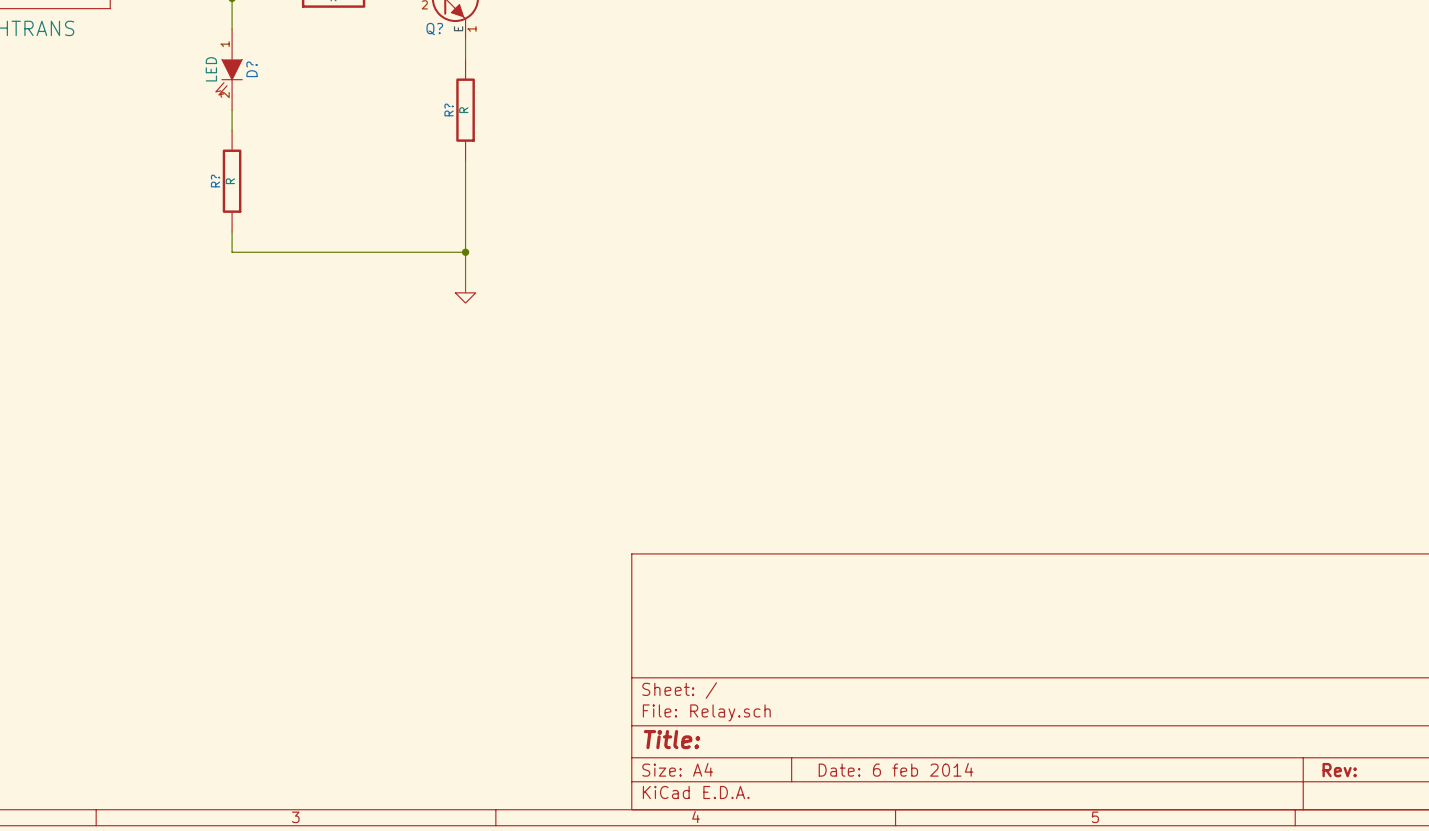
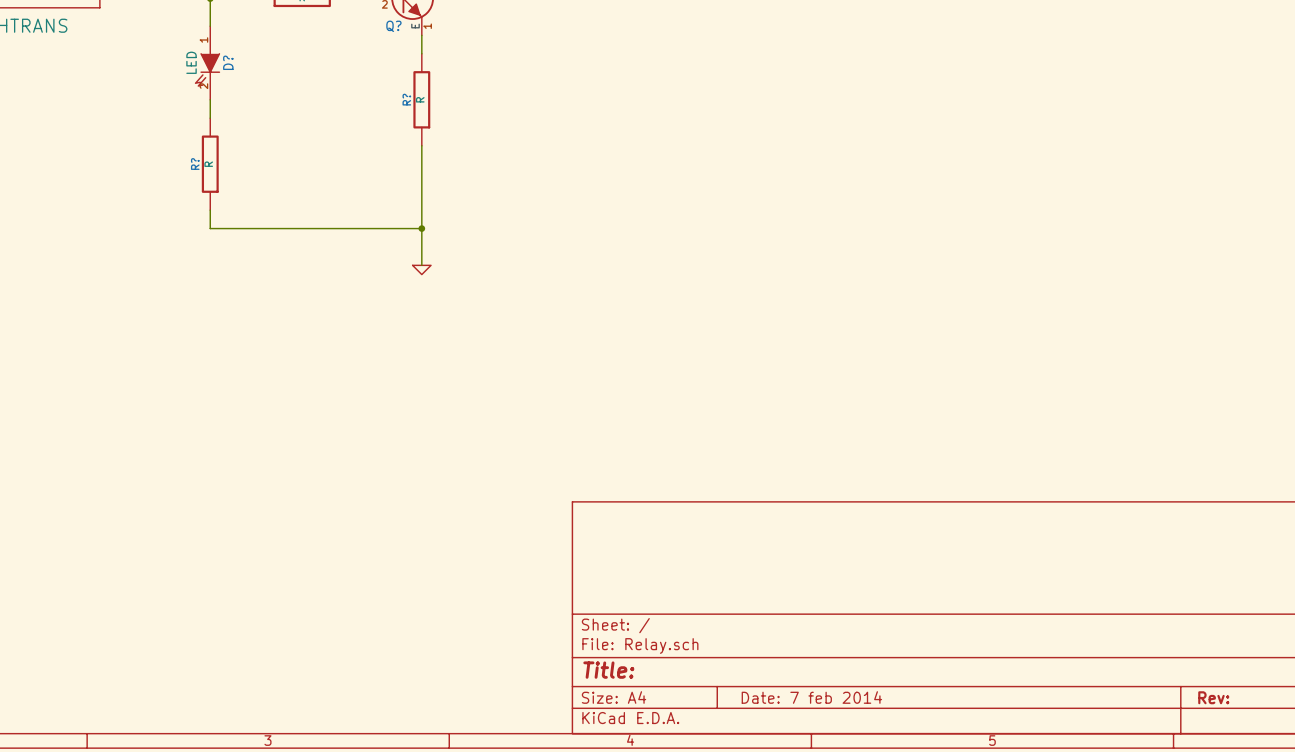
title block: Date: 6 feb 2014 (896, 769) -> Date: 7 feb 2014 (811, 697)

